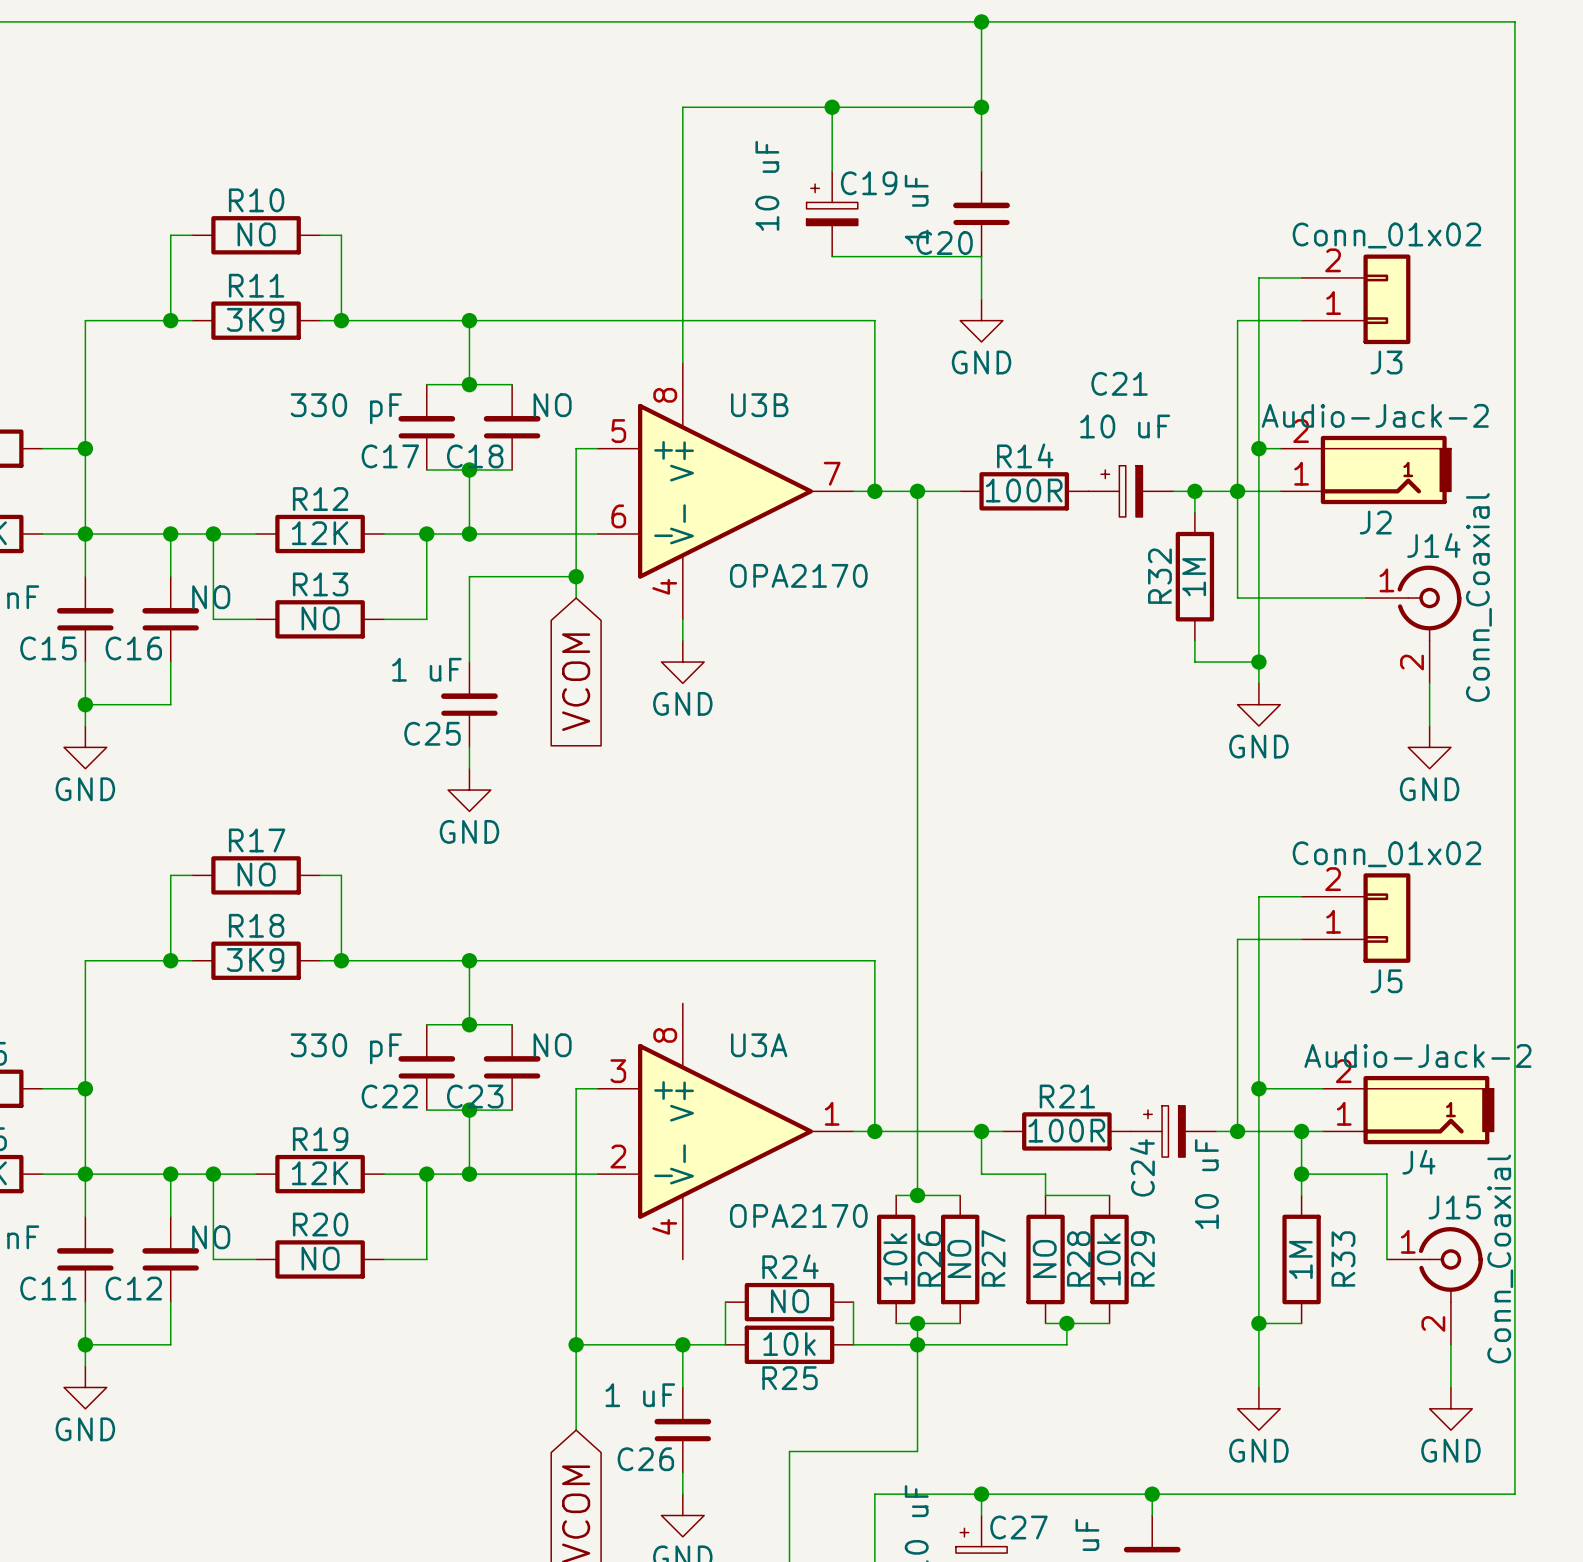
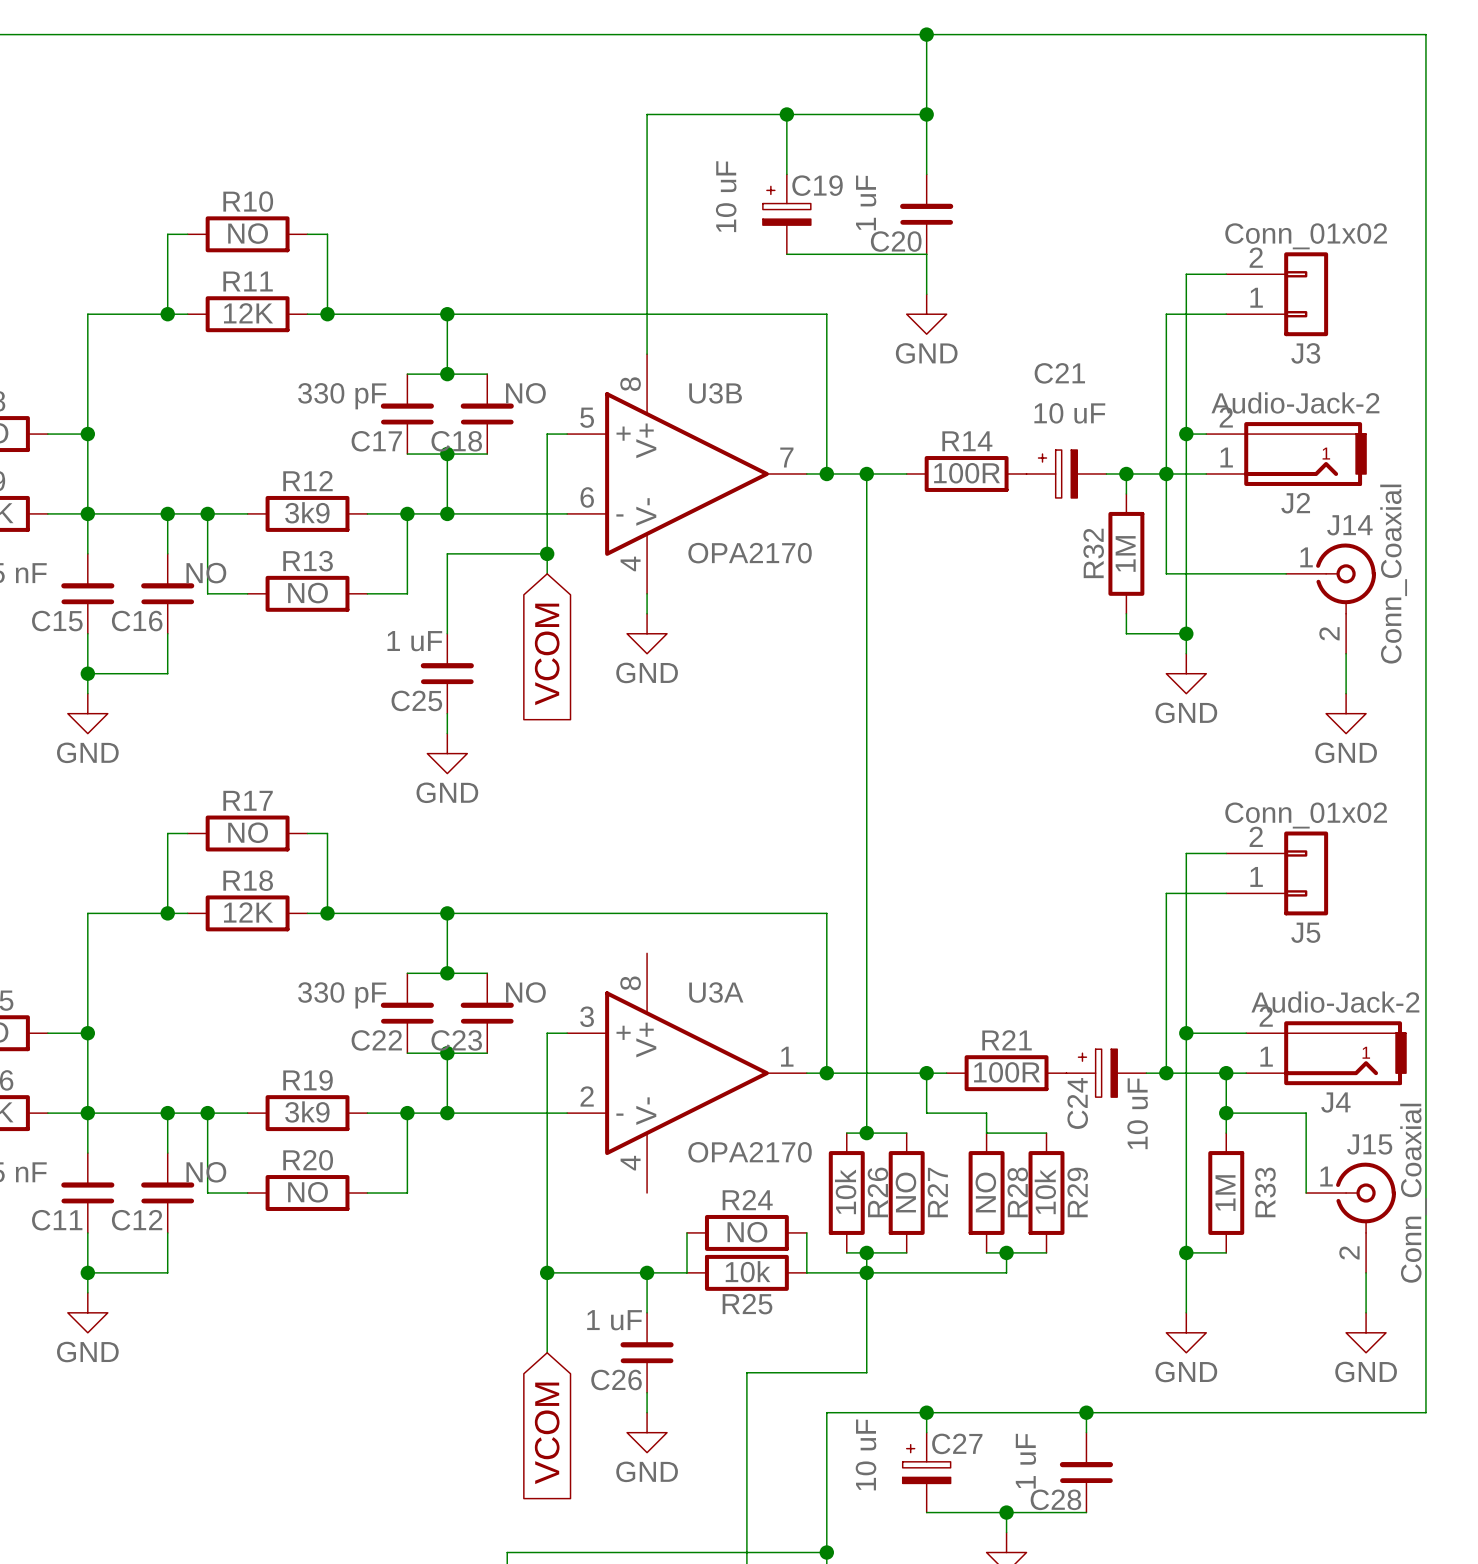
R11 value: 3K9 (255, 319) -> 12K (248, 313)
R12 value: 12K (320, 533) -> 3k9 (307, 512)
R18 value: 3K9 (255, 959) -> 12K (248, 912)
R19 value: 12K (320, 1173) -> 3k9 (307, 1111)

